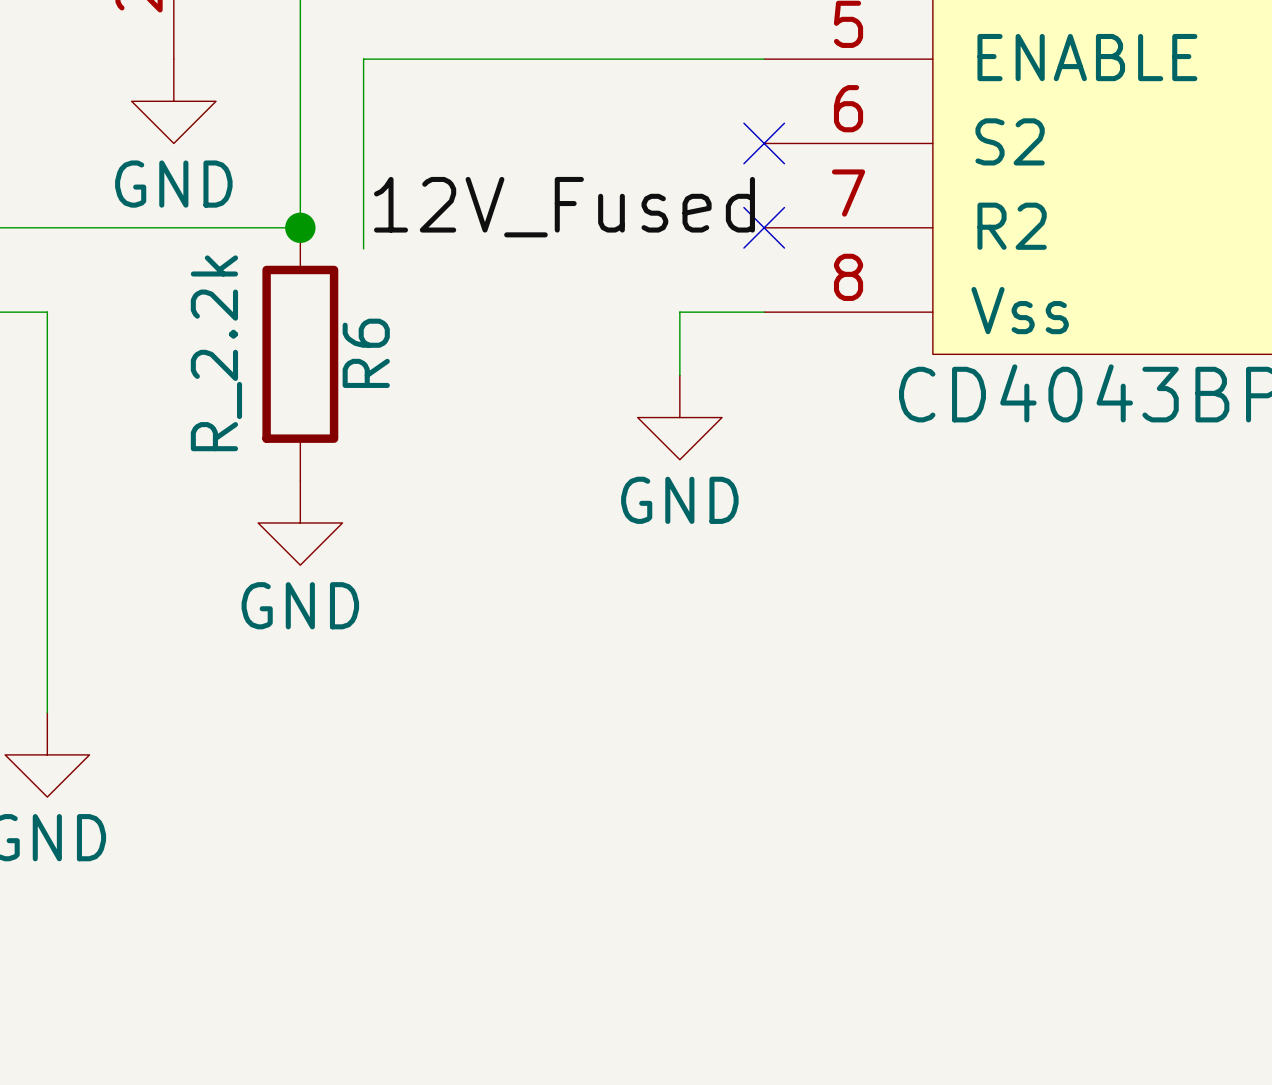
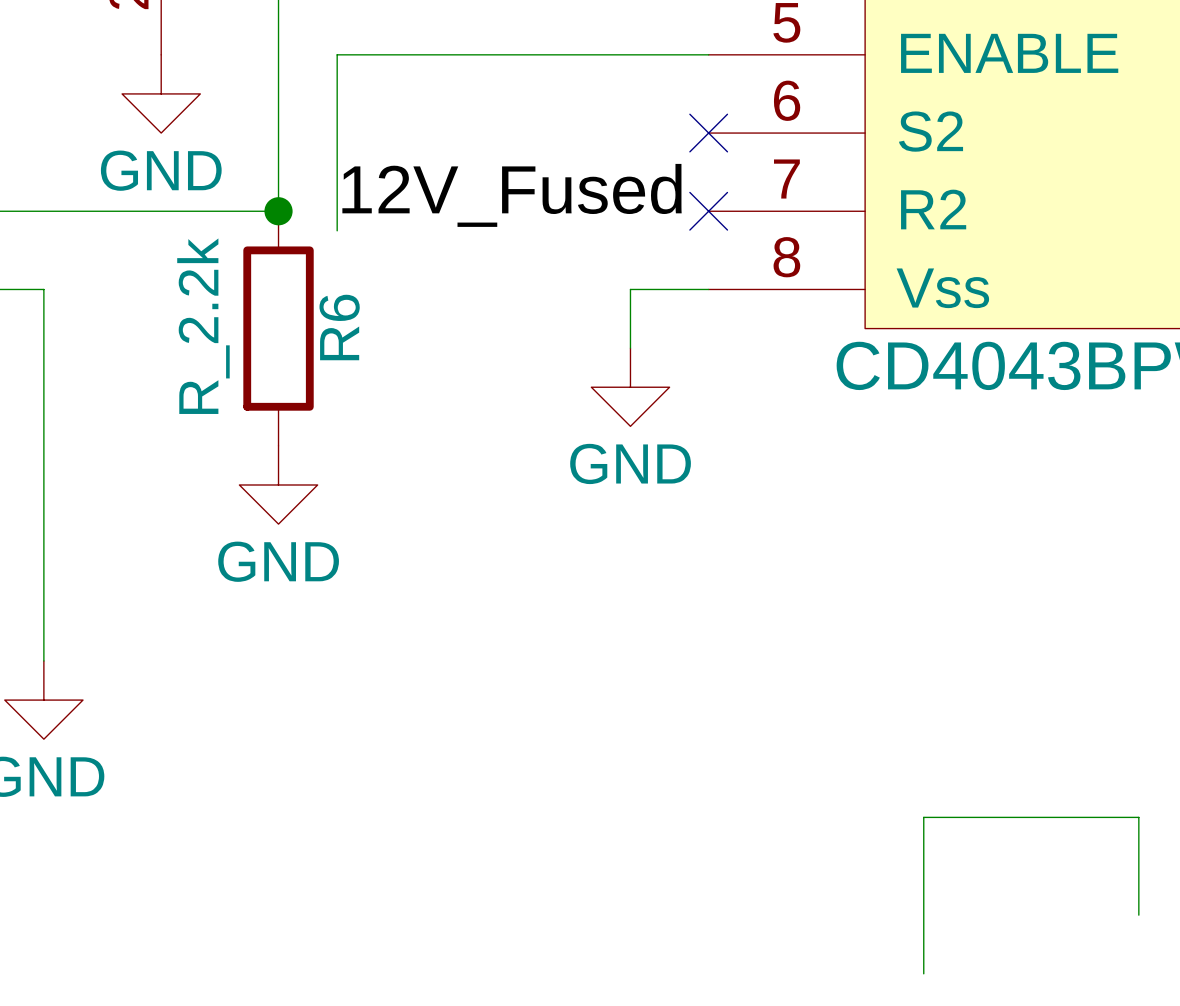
wire: none -> (1138, 915) (1138, 817) (923, 817) (923, 973)

